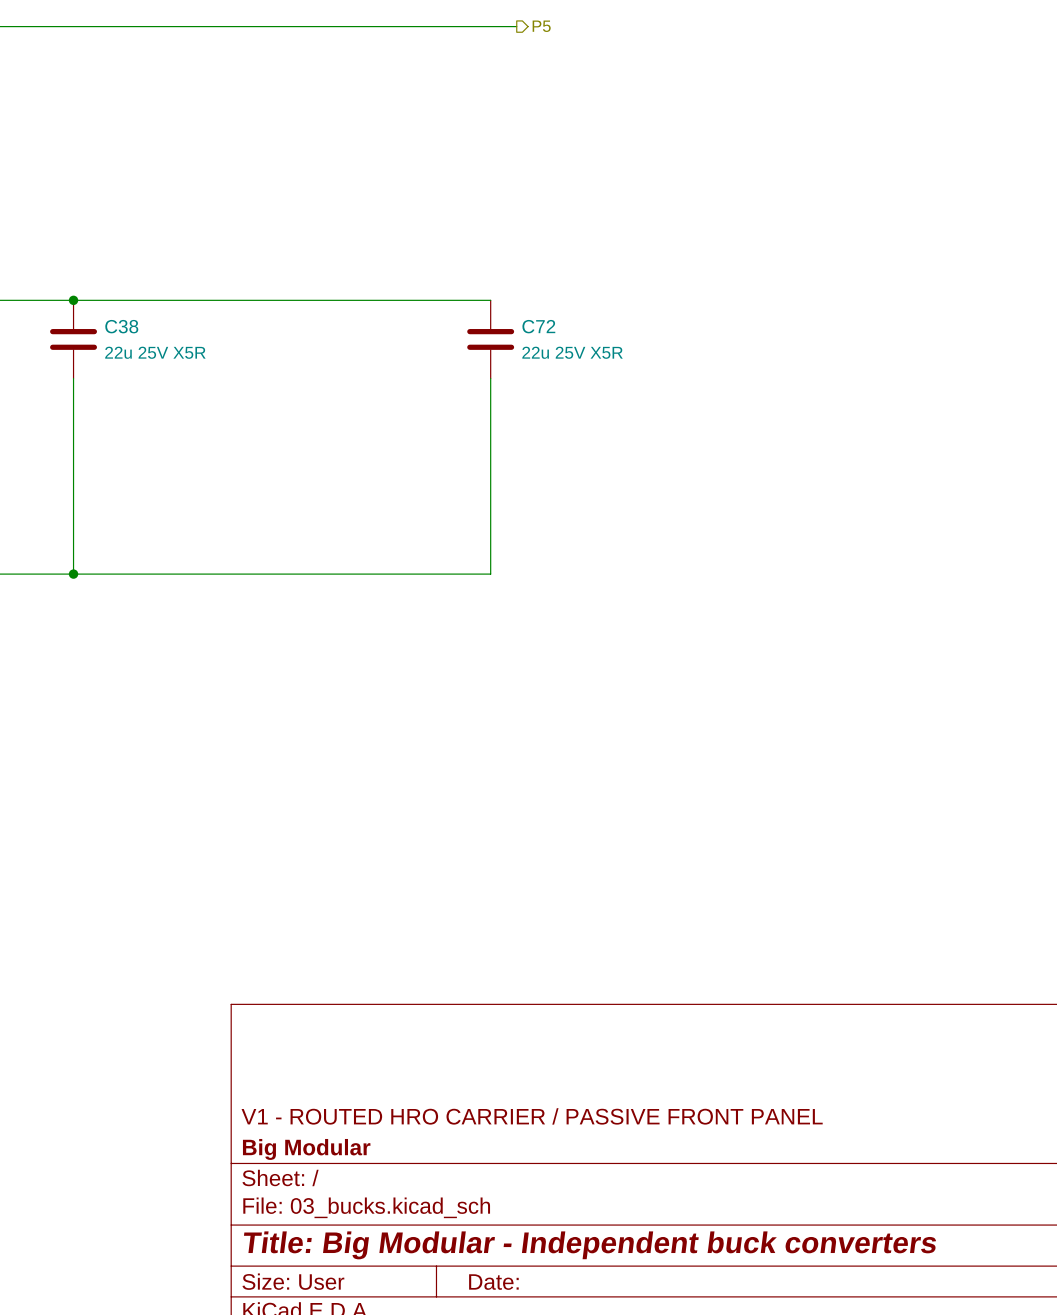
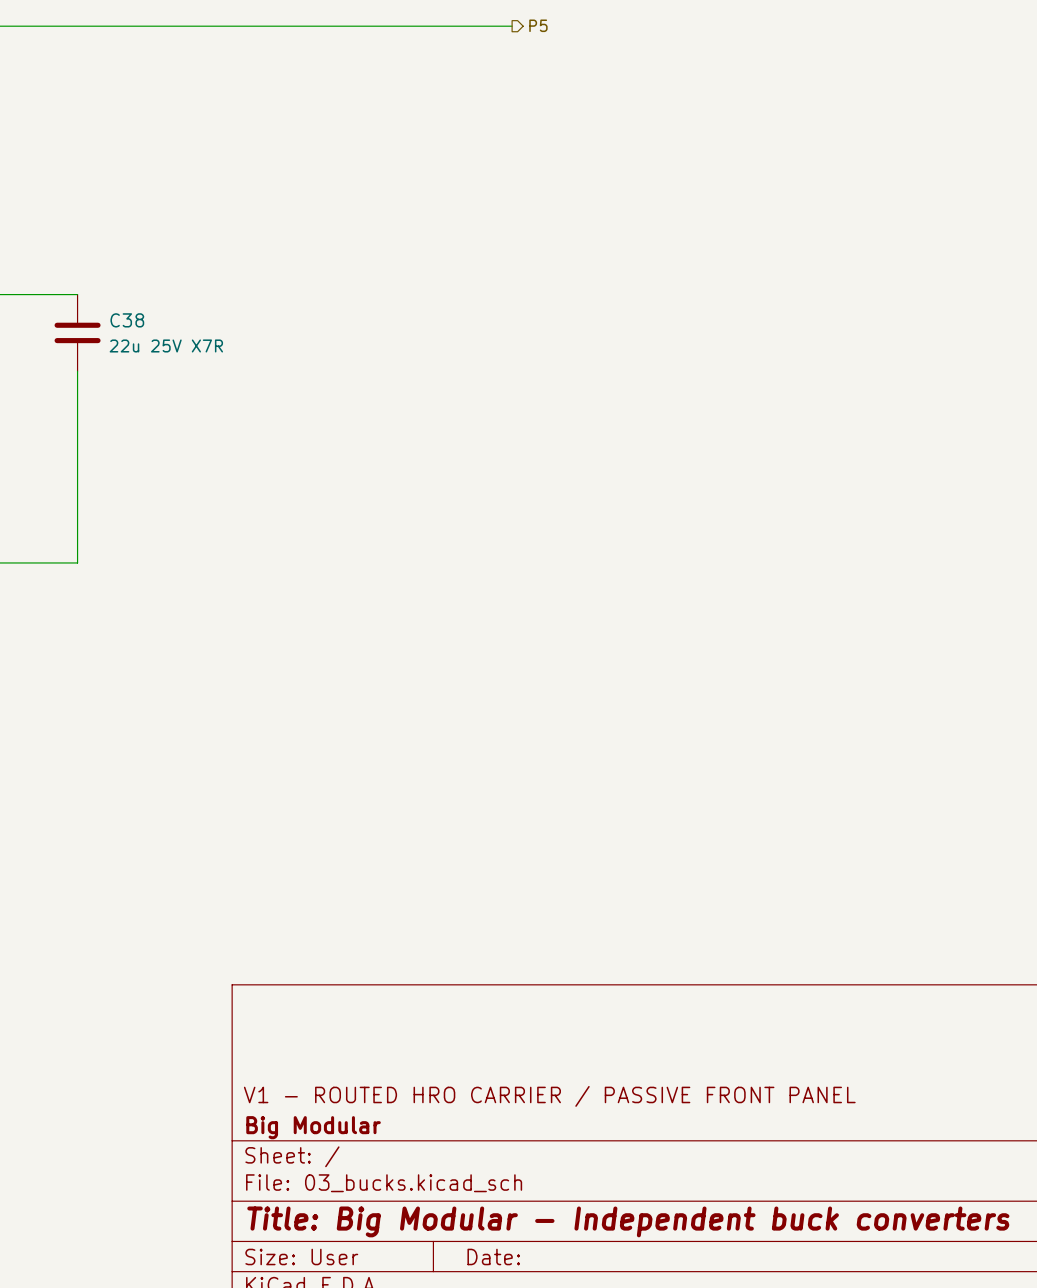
wire: (73, 300) (490, 300) -> none
junction: (73, 300) -> none
C72: 22u 25V X5R (490, 339) -> none
C38 value: 22u 25V X5R (155, 352) -> 22u 25V X7R (166, 345)
wire: (490, 378) (490, 574) (73, 574) -> none
junction: (73, 574) -> none

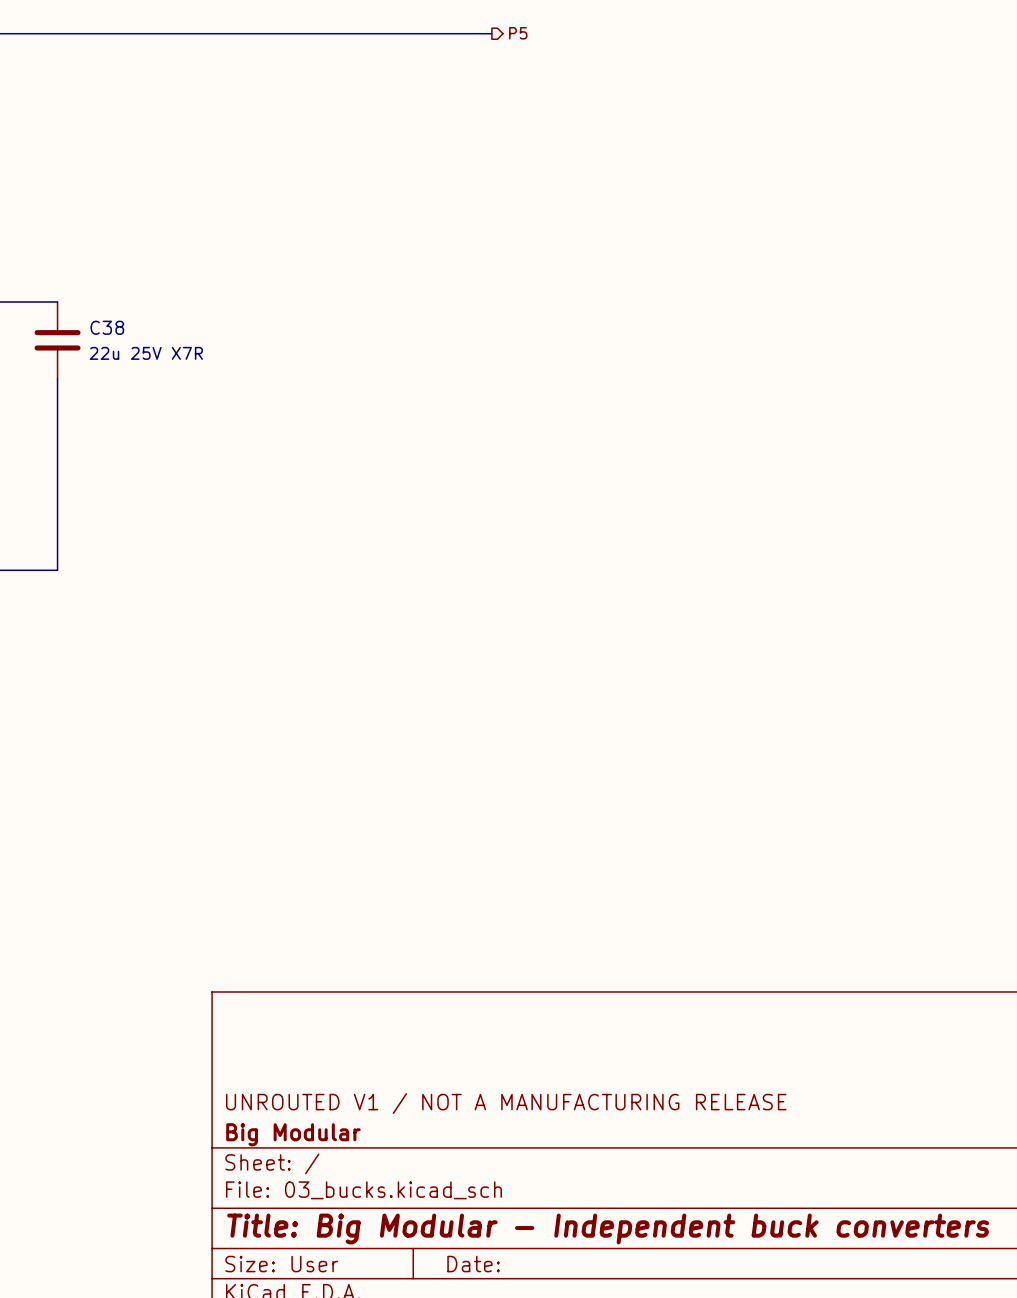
title block: V1 - ROUTED HRO CARRIER / PASSIVE FRONT PANEL (549, 1096) -> UNROUTED V1 / NOT A MANUFACTURING RELEASE (506, 1103)

